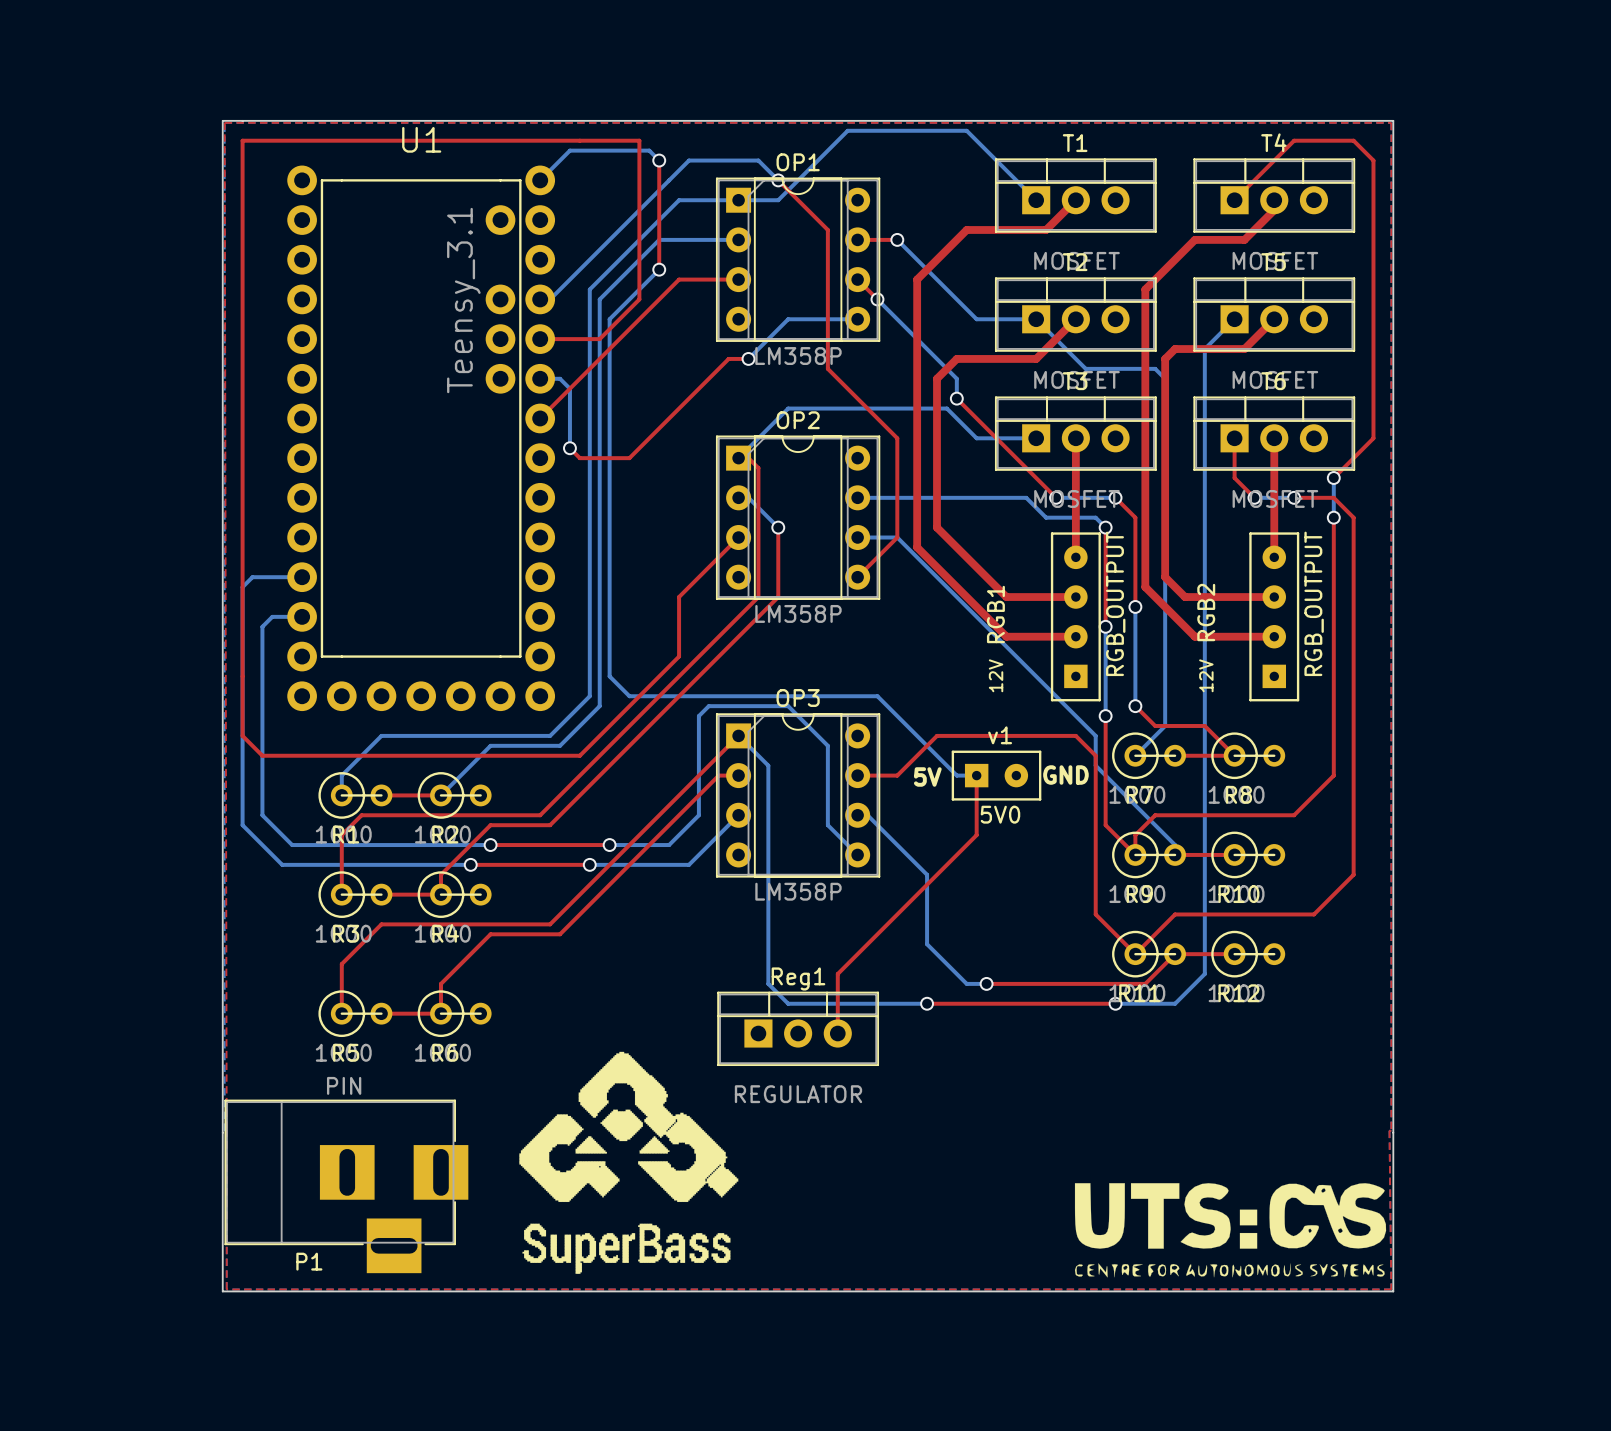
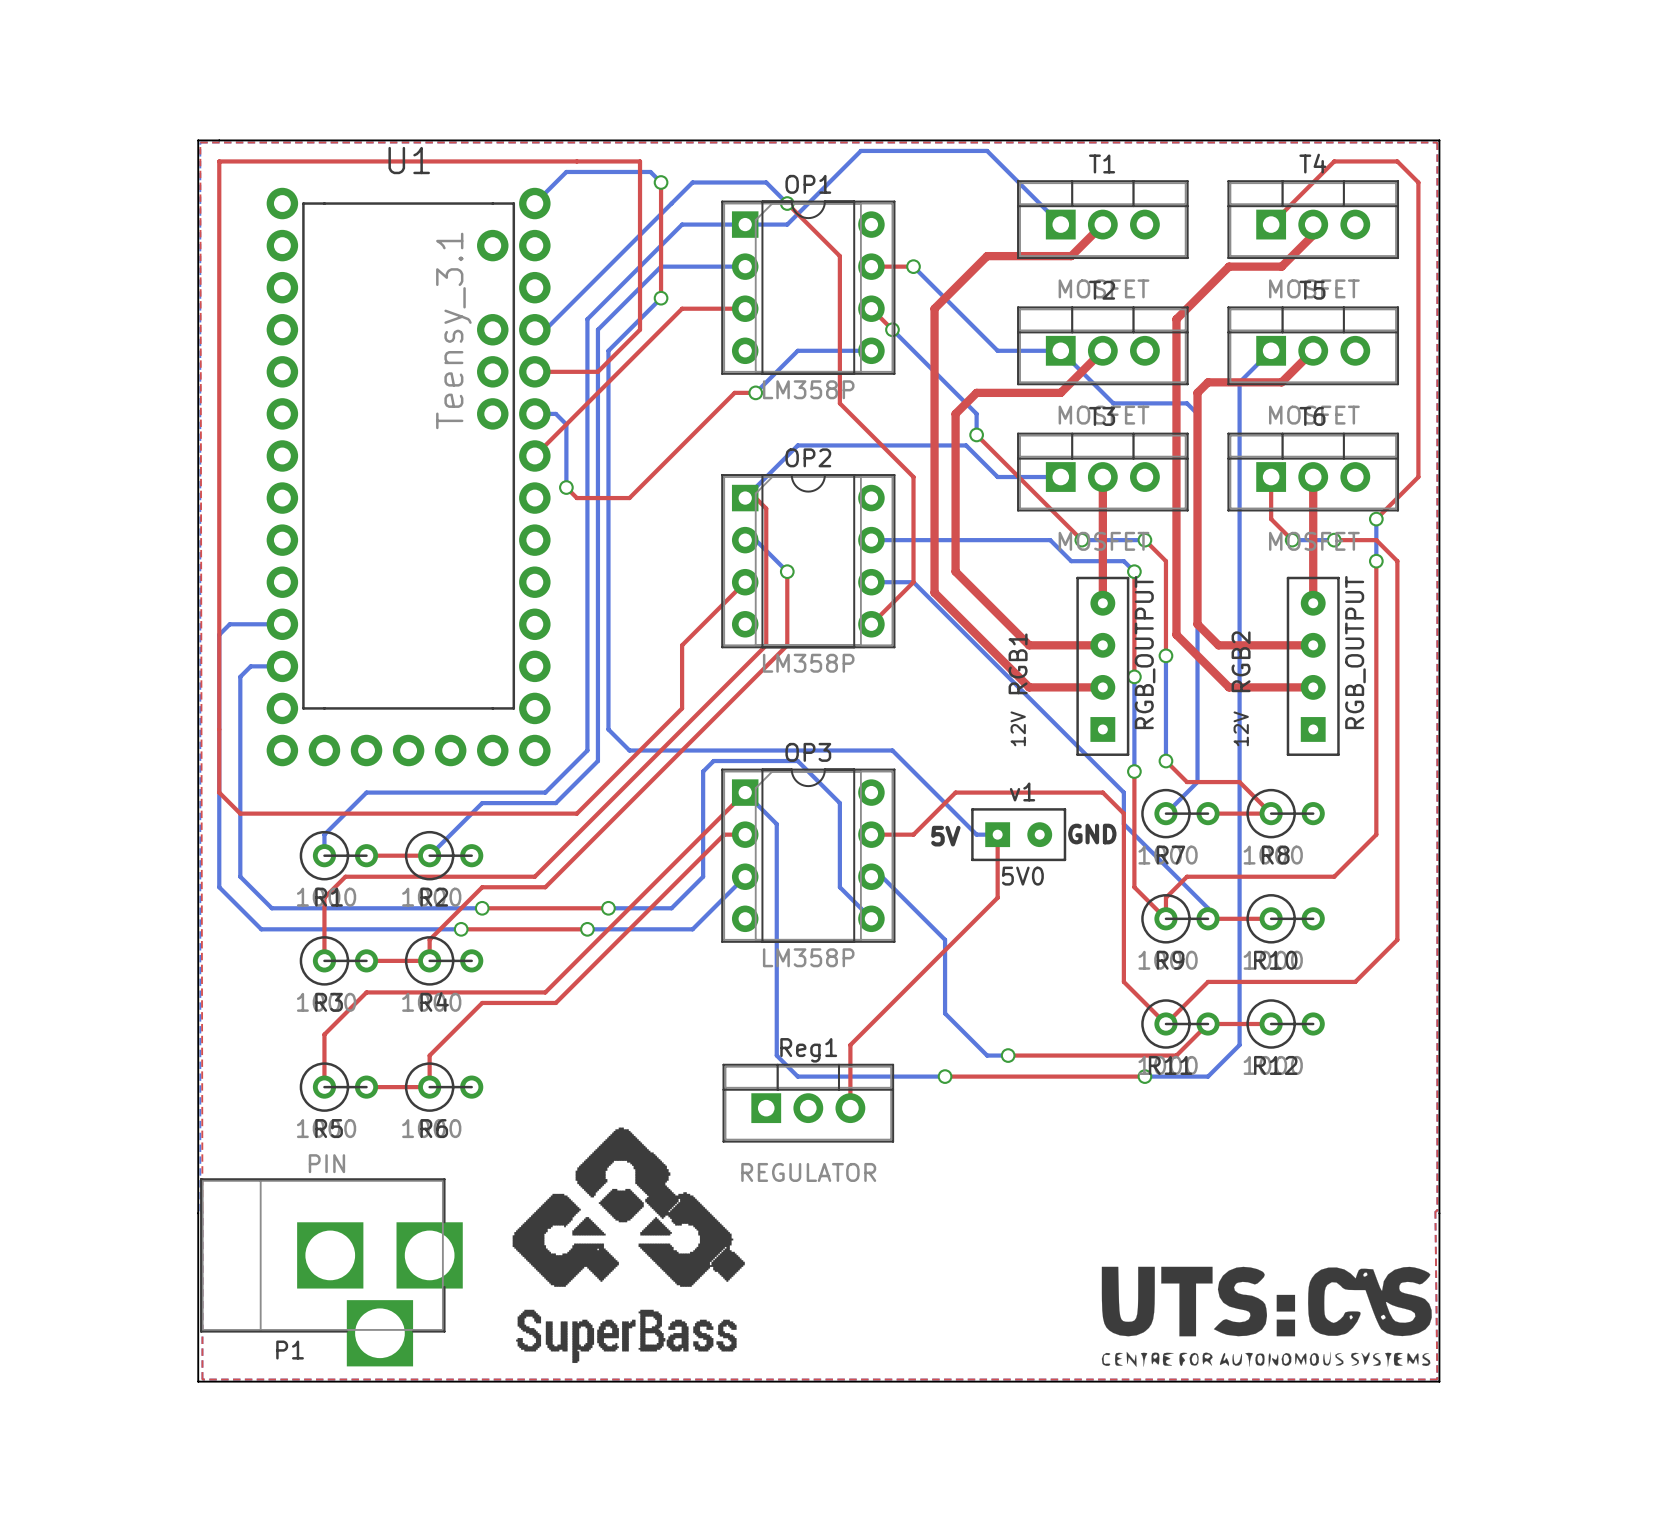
P1 footprint: [224, 1099, 469, 1274] -> [200, 1178, 463, 1367]

